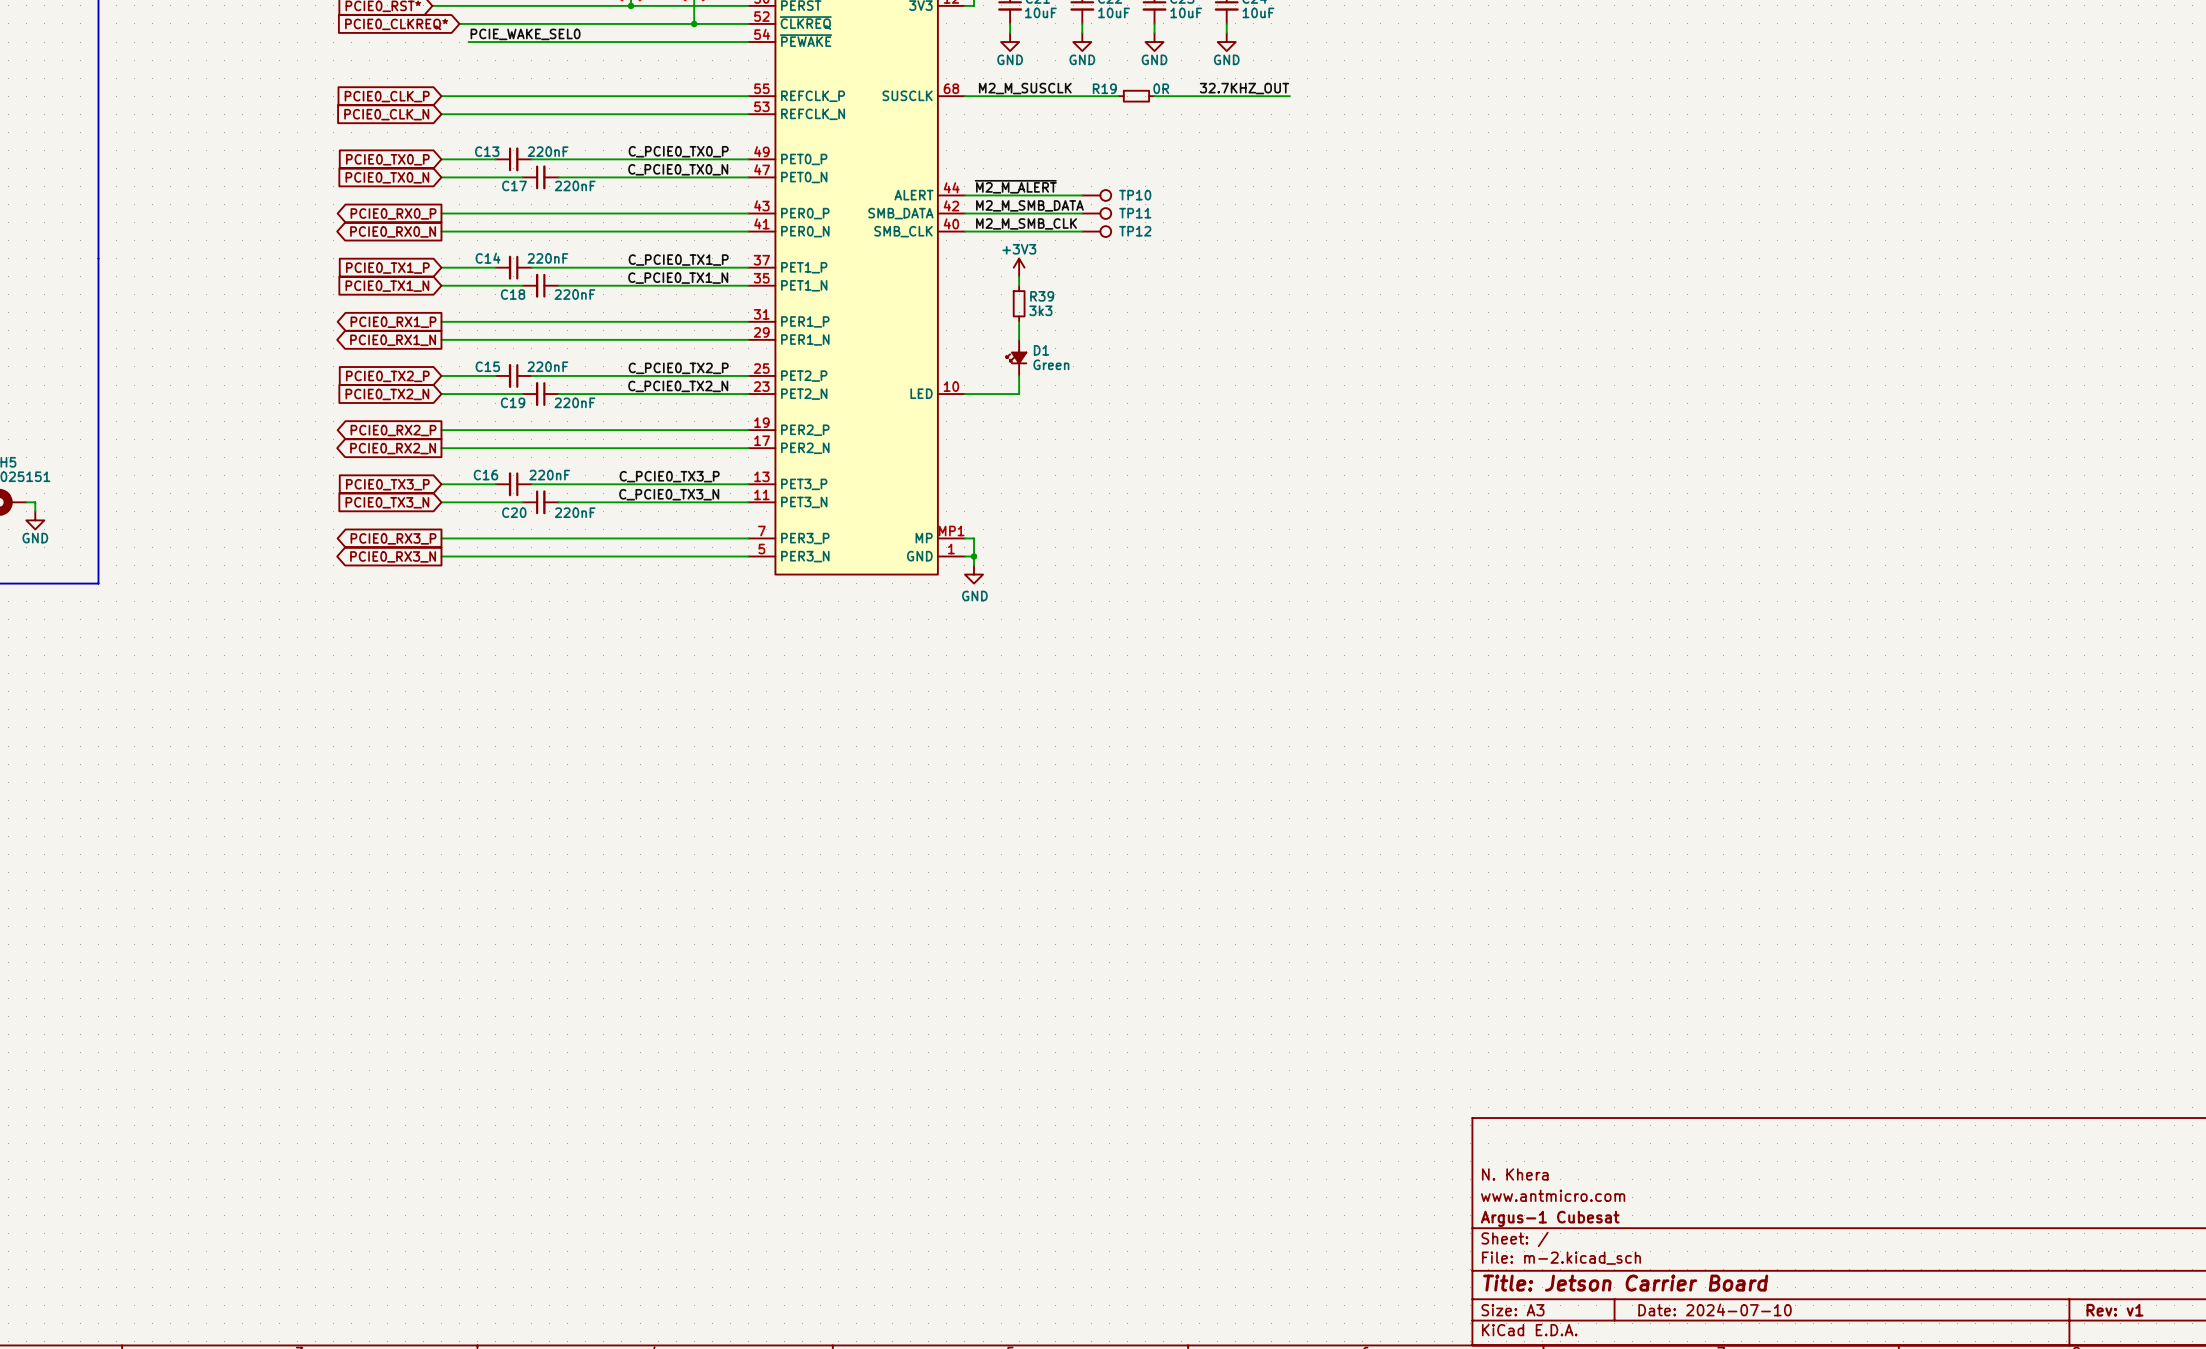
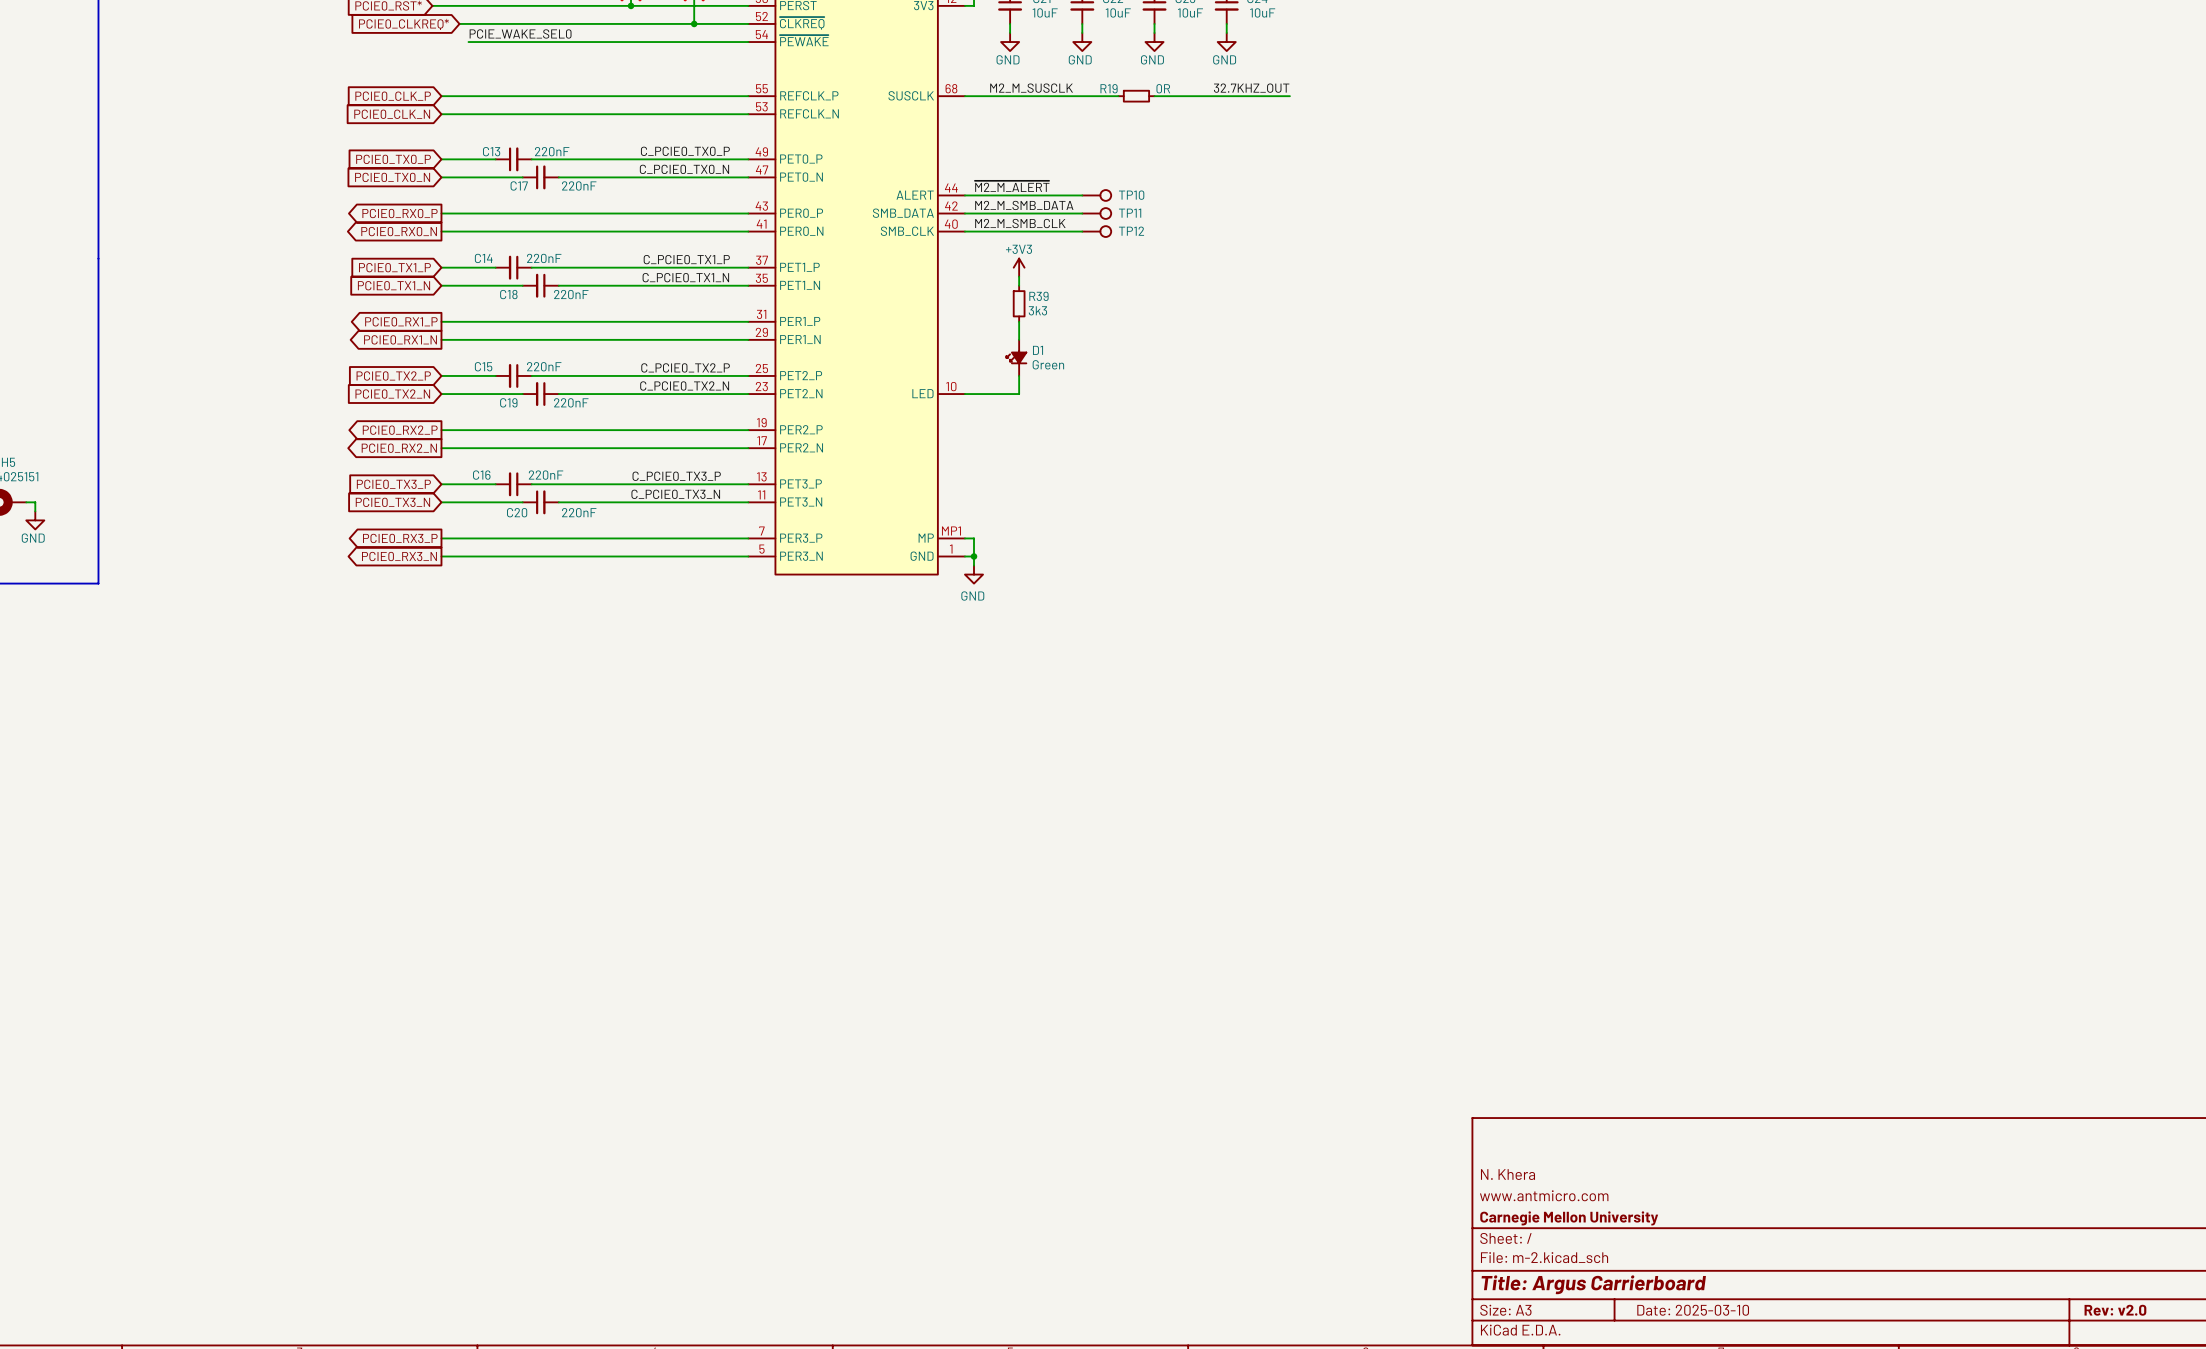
title block: Argus-1 Cubesat (1550, 1218) -> Carnegie Mellon University (1569, 1218)
title block: Title: Jetson Carrier Board (1625, 1283) -> Title: Argus Carrierboard (1593, 1284)
title block: Date: 2024-07-10 (1715, 1309) -> Date: 2025-03-10 (1693, 1310)
title block: Rev: v1 (2114, 1310) -> Rev: v2.0 (2115, 1310)

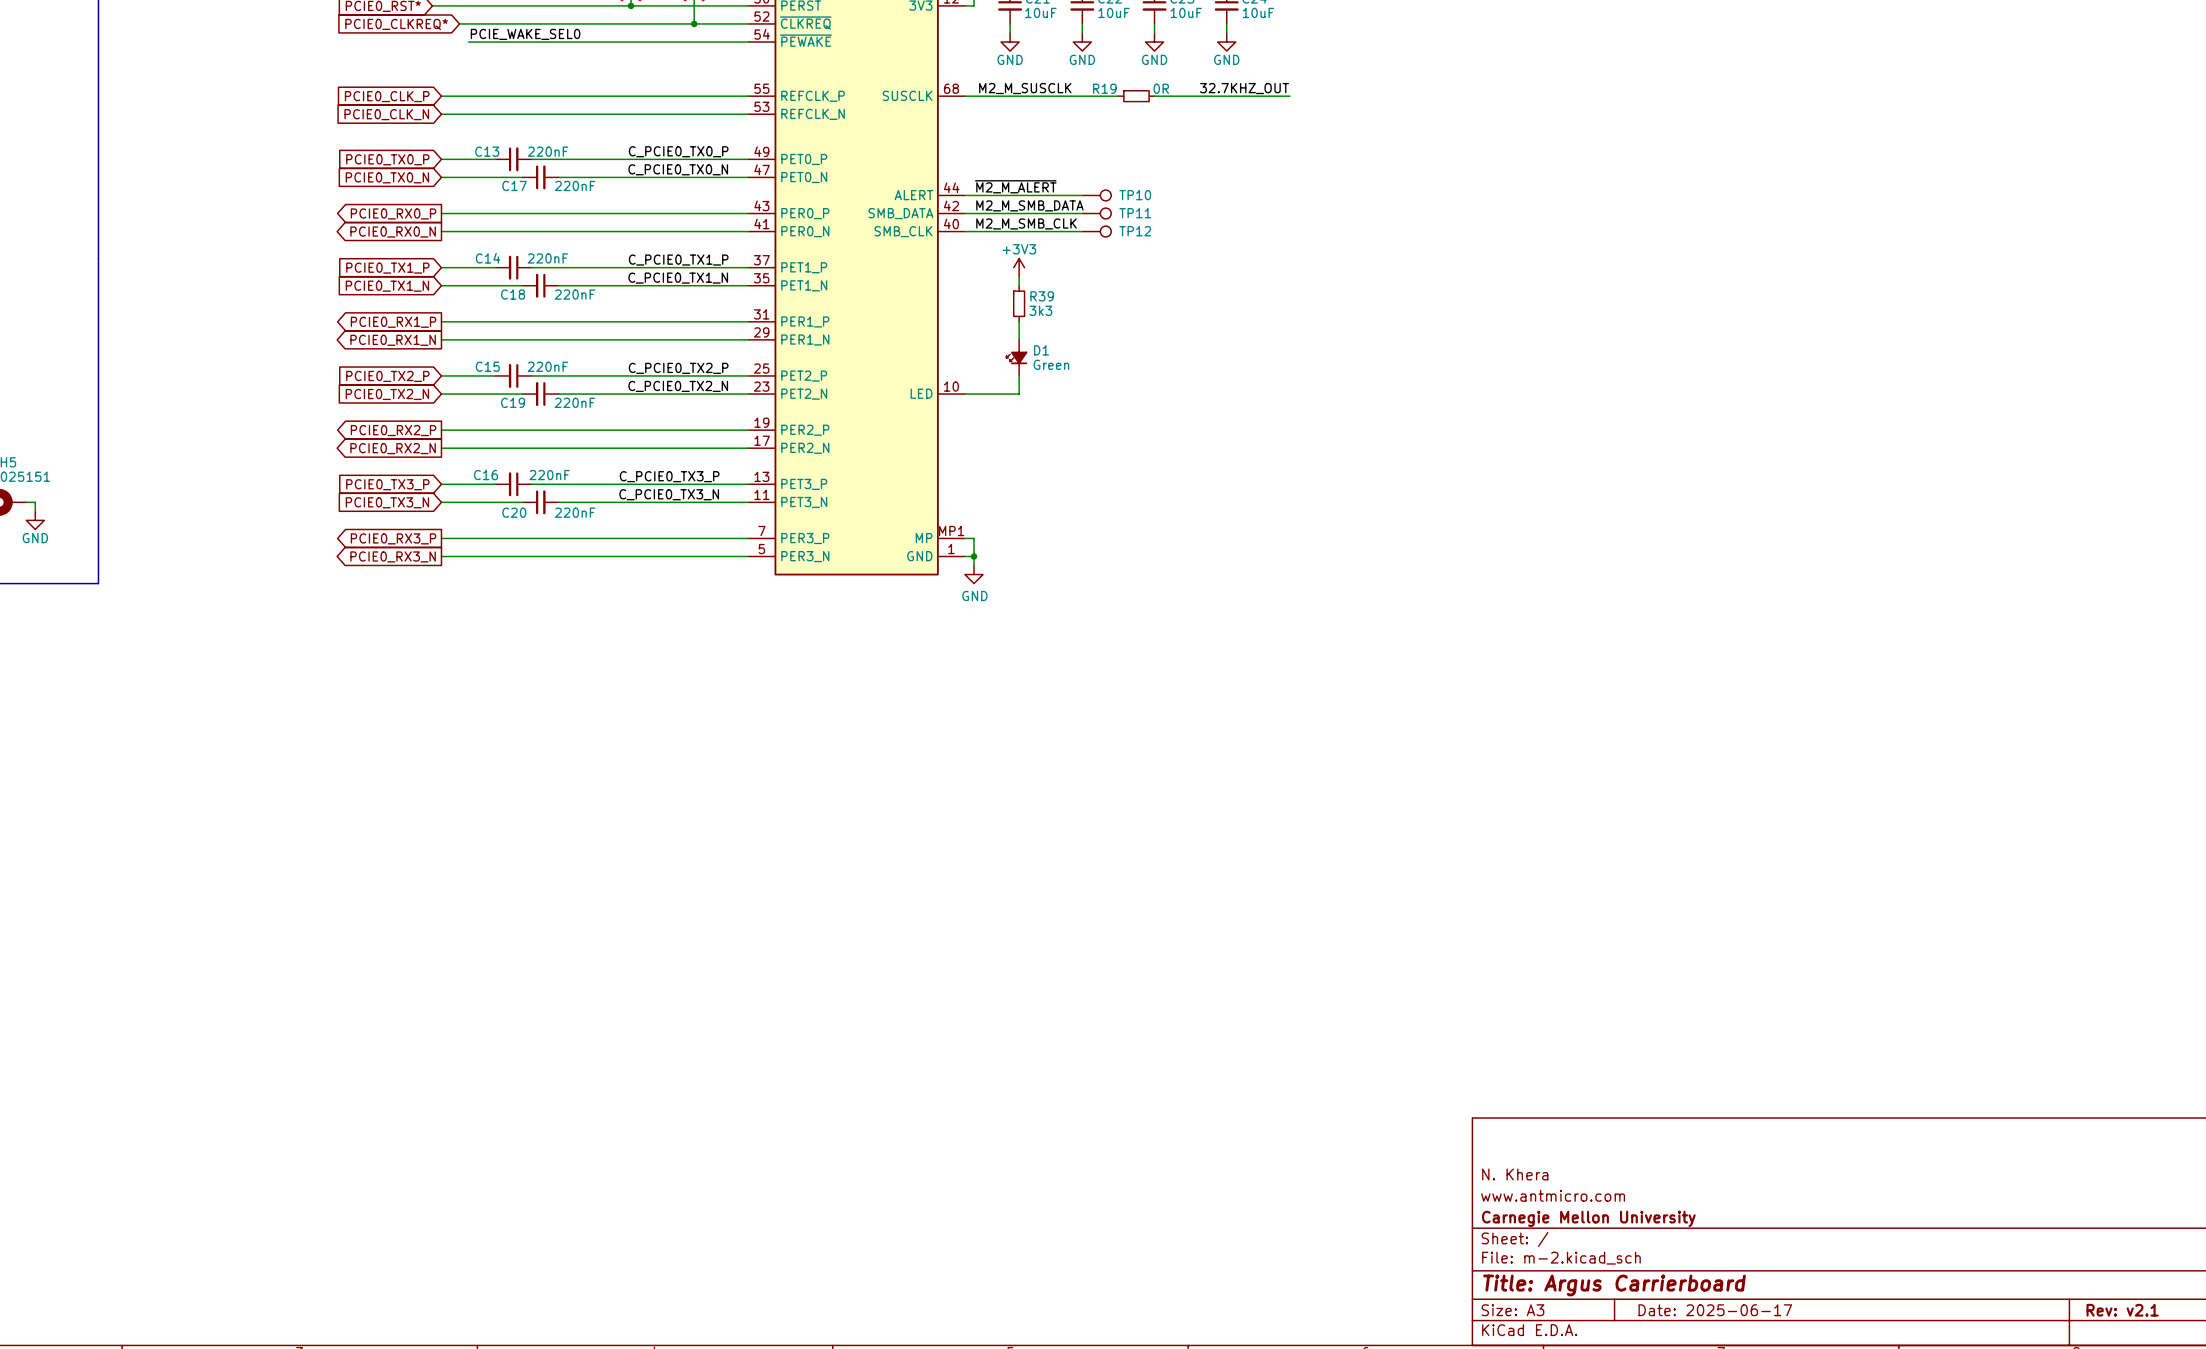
title block: Date: 2025-03-10 (1693, 1310) -> Date: 2025-06-17 (1715, 1310)
title block: Rev: v2.0 (2115, 1310) -> Rev: v2.1 (2122, 1310)

